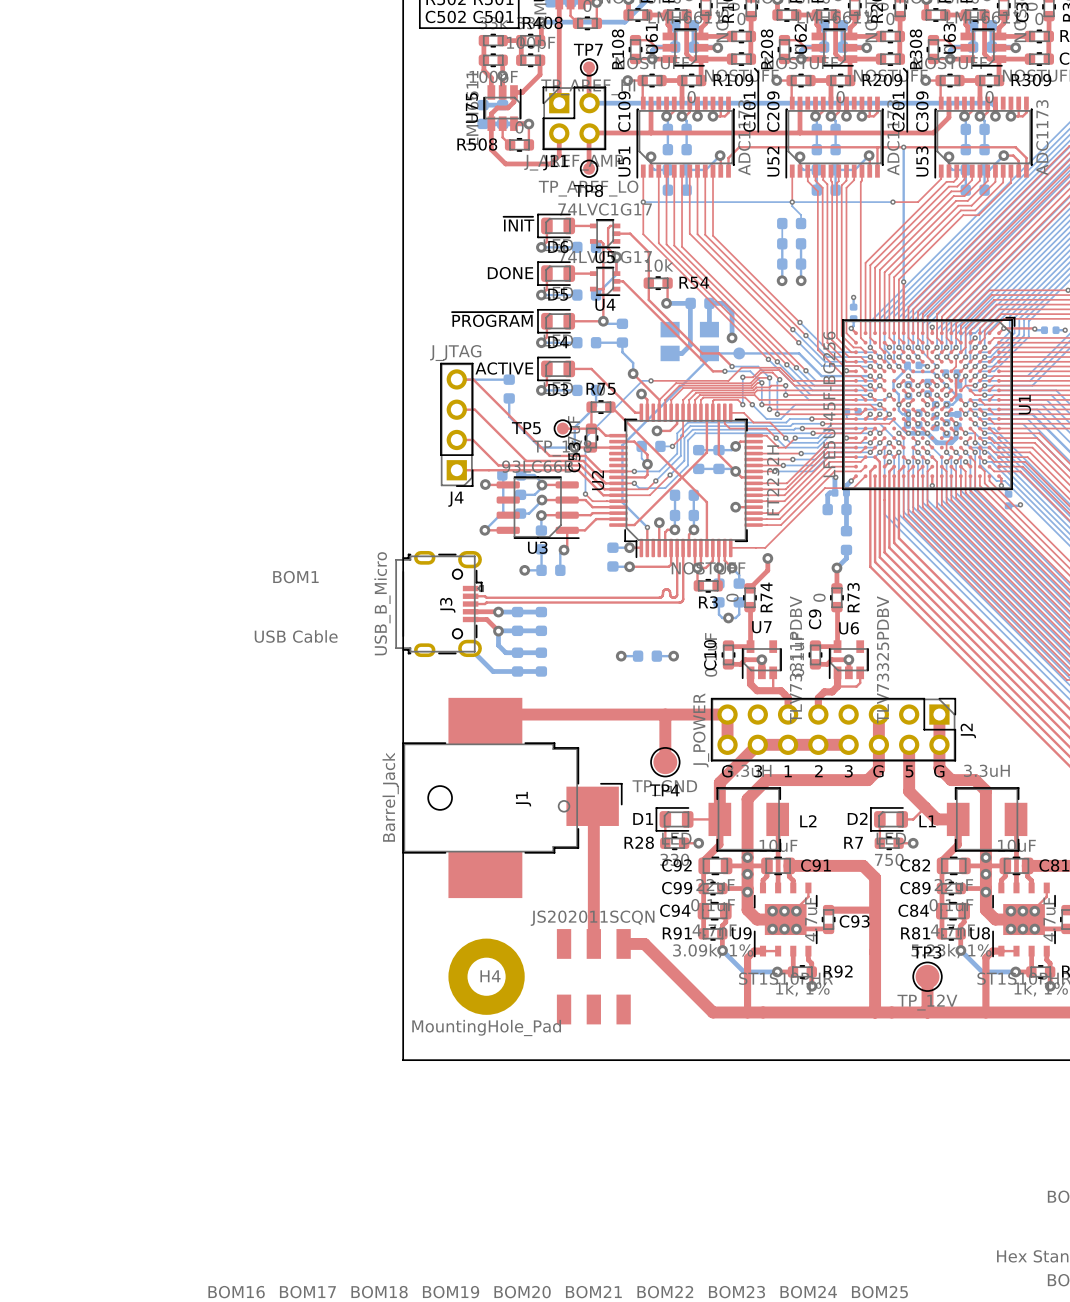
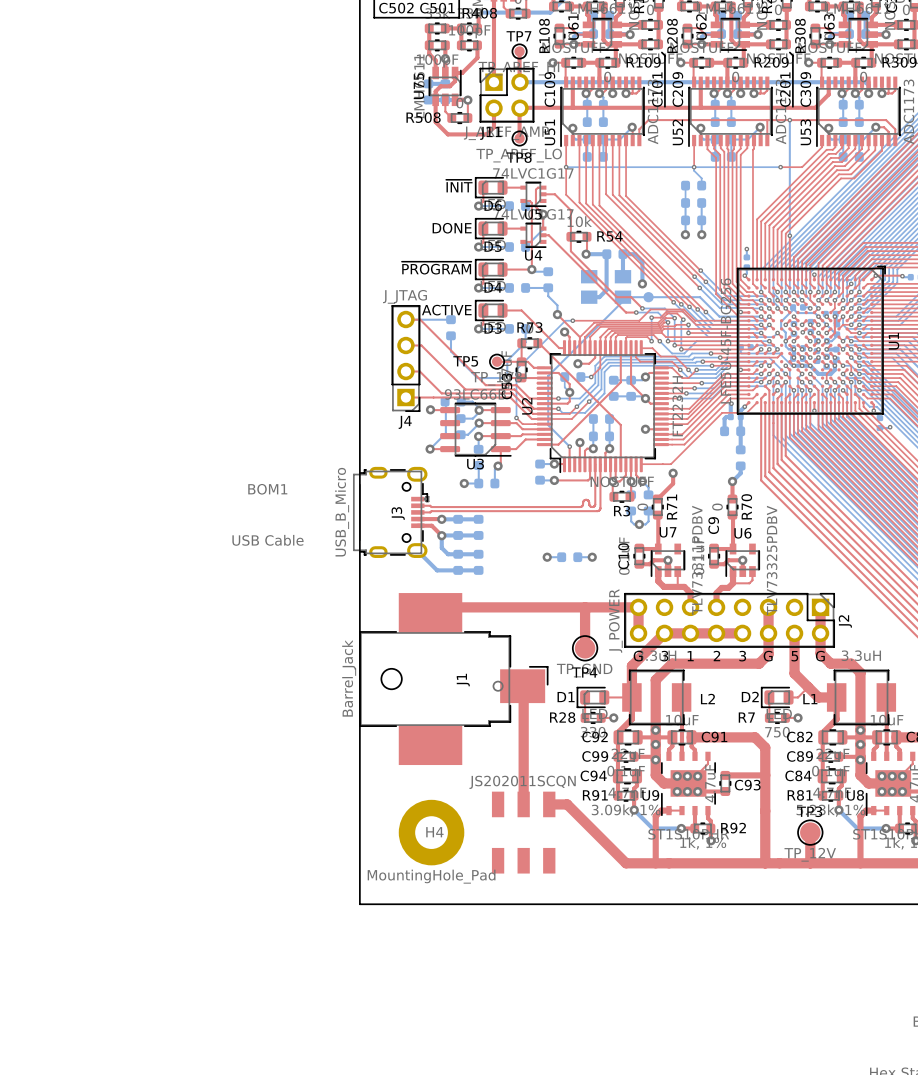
R75 name: R75 (601, 388) -> R73 (529, 327)
R74 name: R74 (766, 597) -> R71 (672, 507)
R73 name: R73 (853, 597) -> R70 (746, 506)

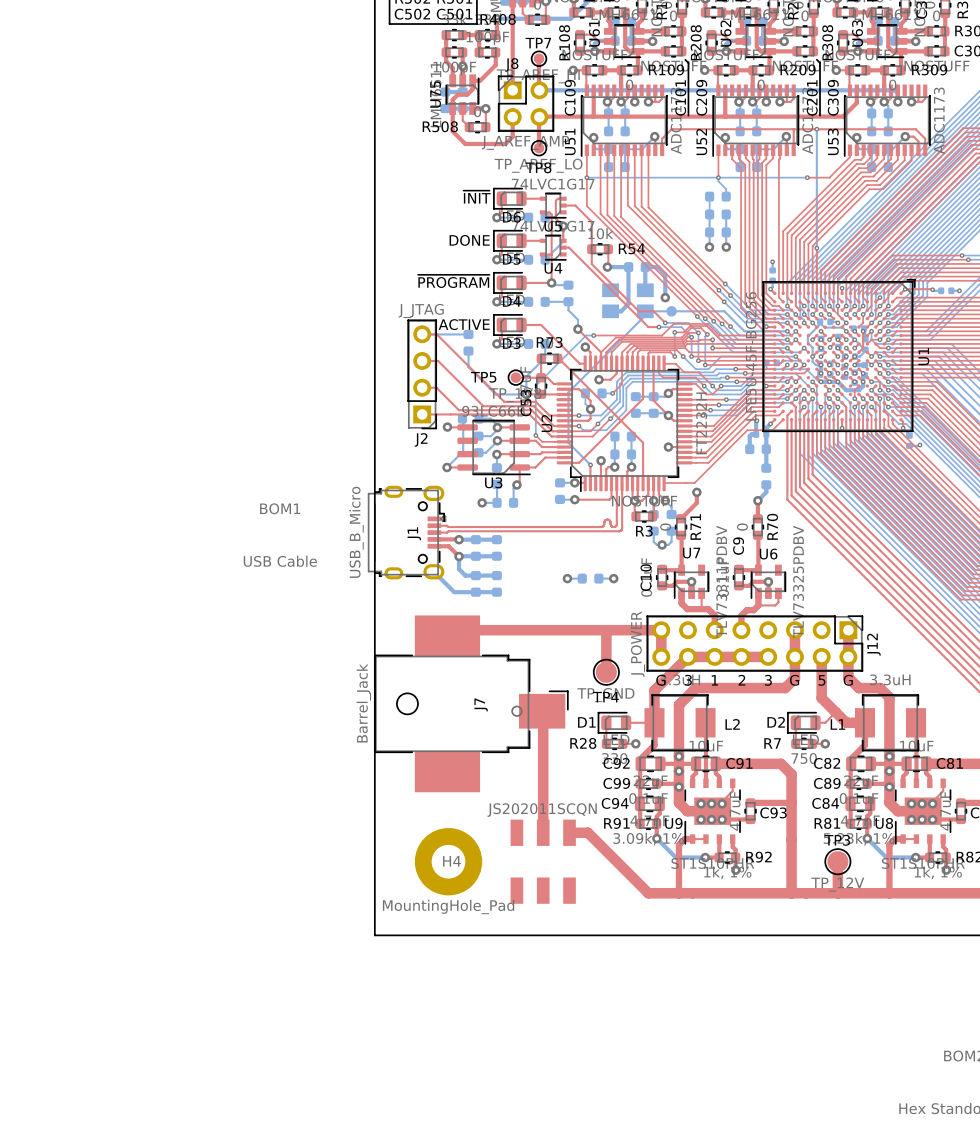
J11 name: J11 (490, 133) -> J8 (511, 64)
J4 name: J4 (405, 422) -> J2 (421, 439)
J3 name: J3 (398, 513) -> J1 (414, 533)
J2 name: J2 (845, 621) -> J12 (873, 644)
J1 name: J1 (463, 680) -> J7 (481, 704)

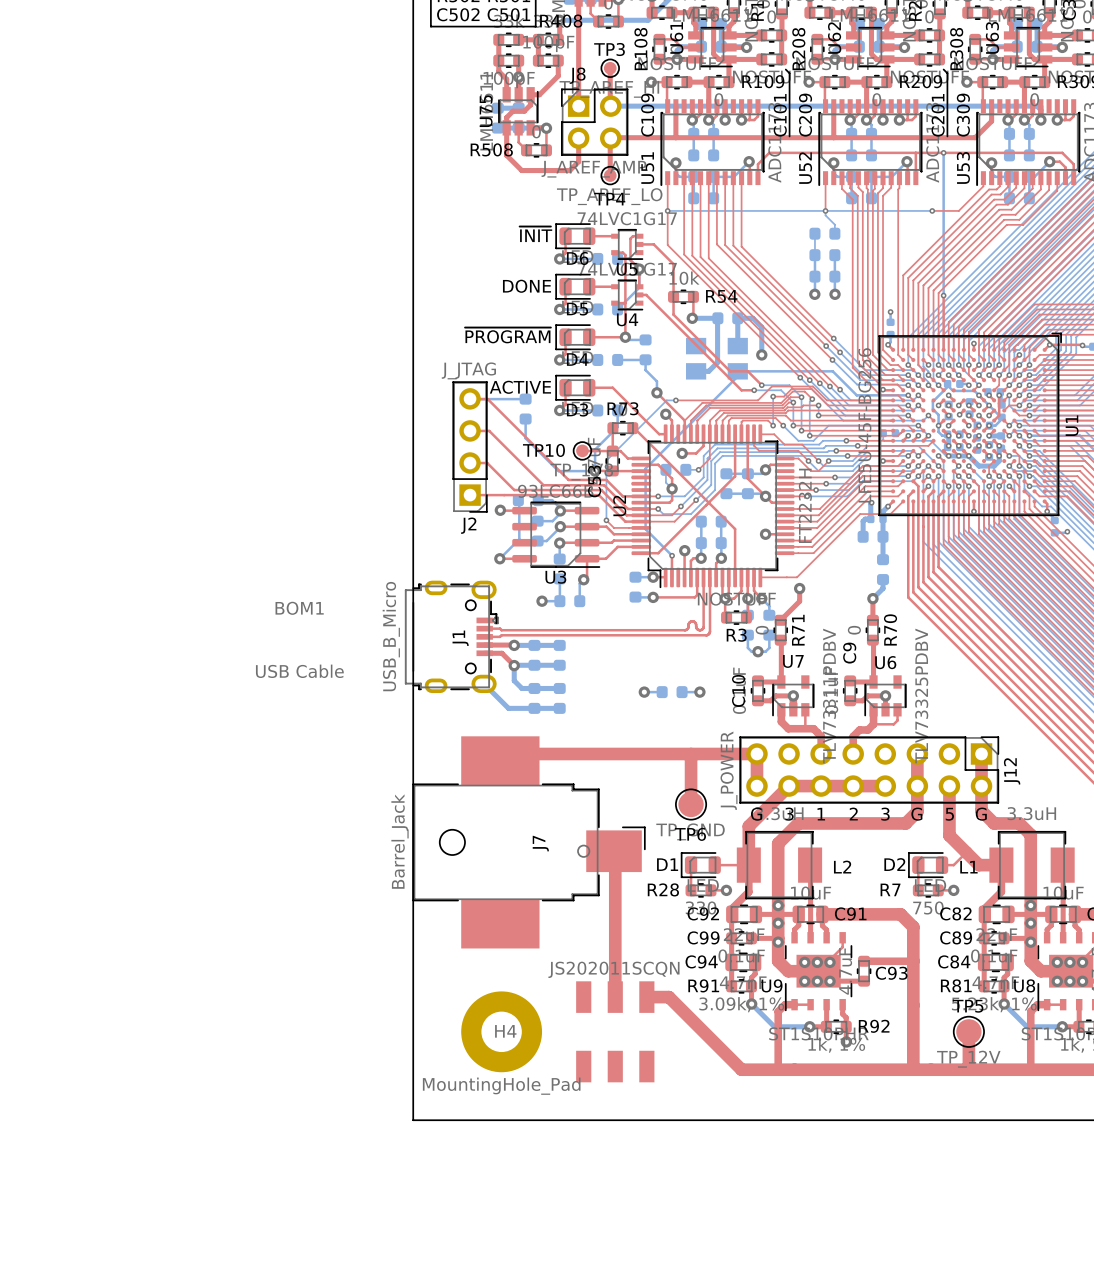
TP7 name: TP7 (538, 43) -> TP3 (609, 49)
TP8 name: TP8 (538, 167) -> TP4 (609, 199)
part: (671, 311) -> none
TP5 name: TP5 (483, 377) -> TP10 (543, 450)
TP4 name: TP4 (605, 697) -> TP6 (690, 834)
TP3 name: TP3 (837, 840) -> TP5 (968, 1006)

